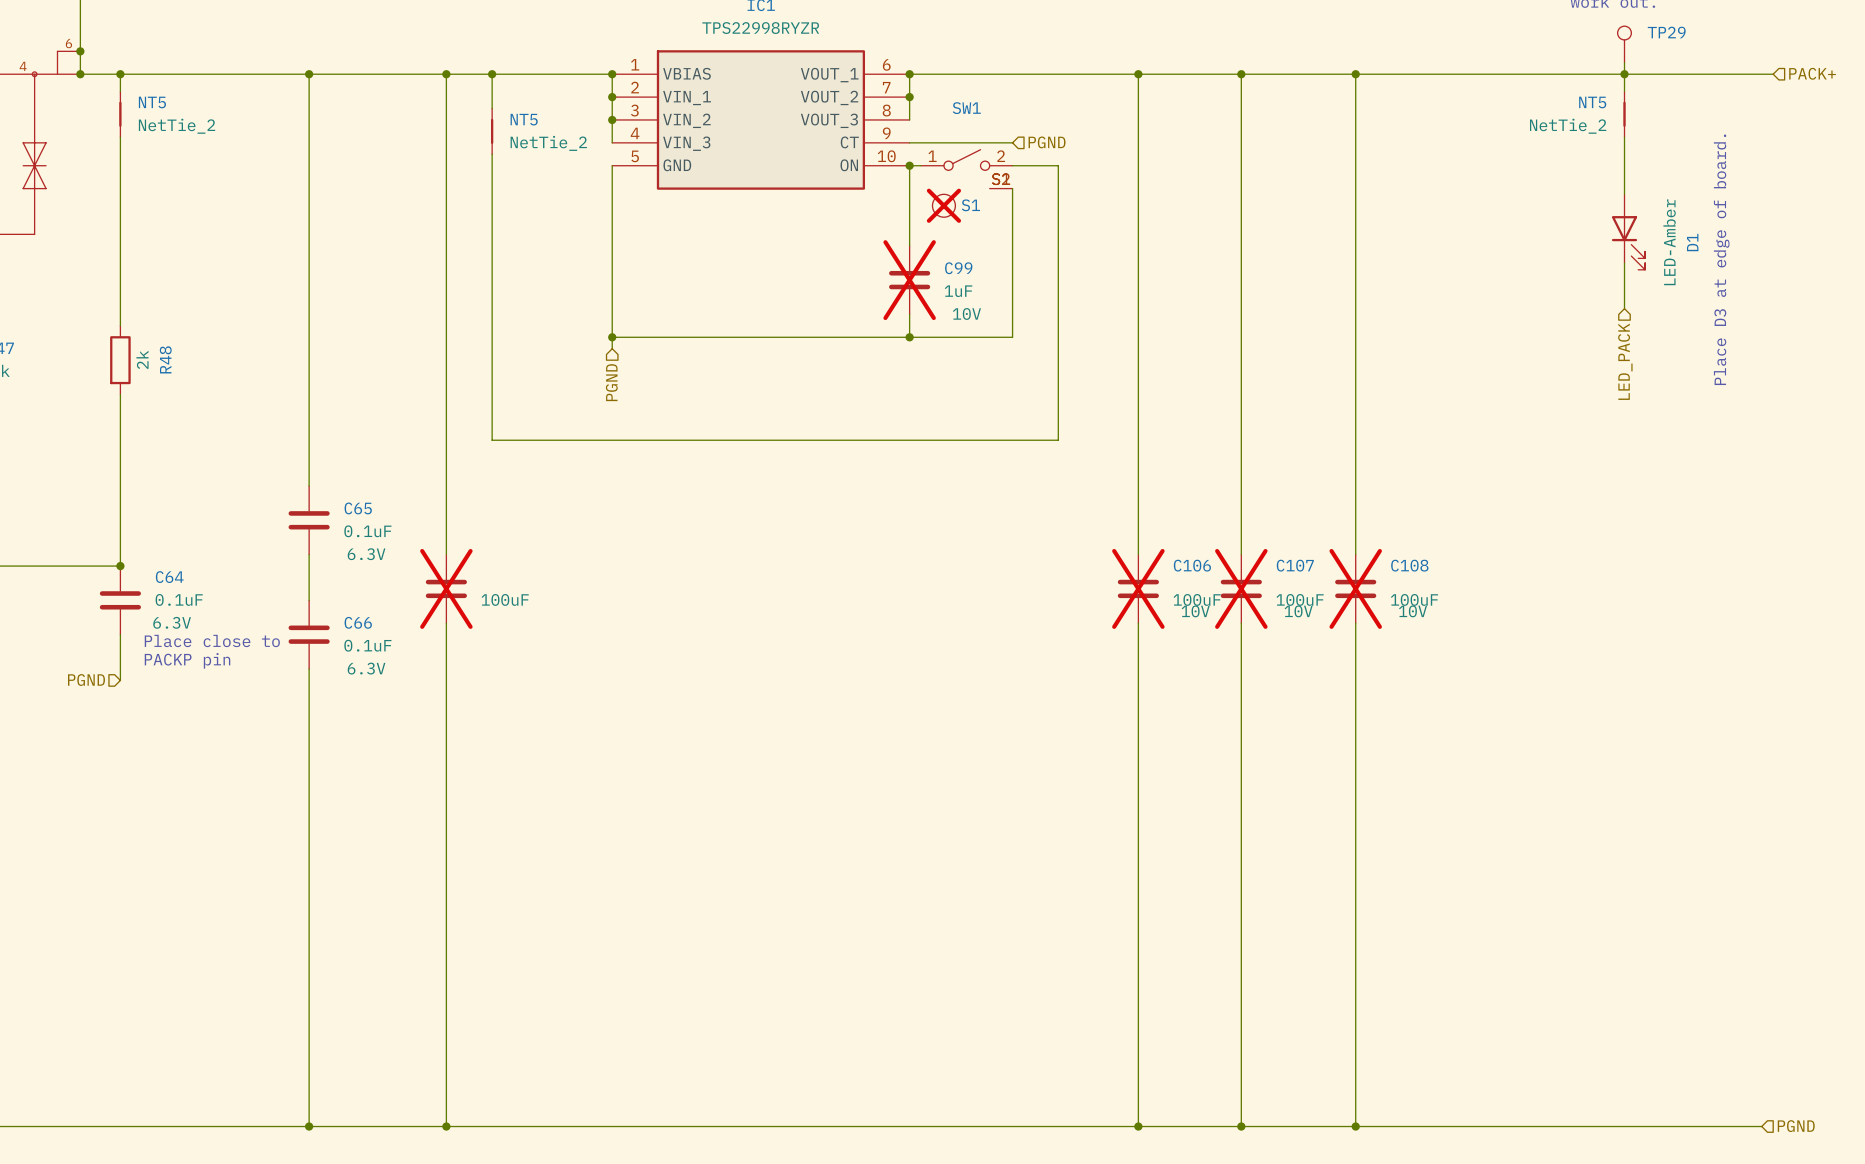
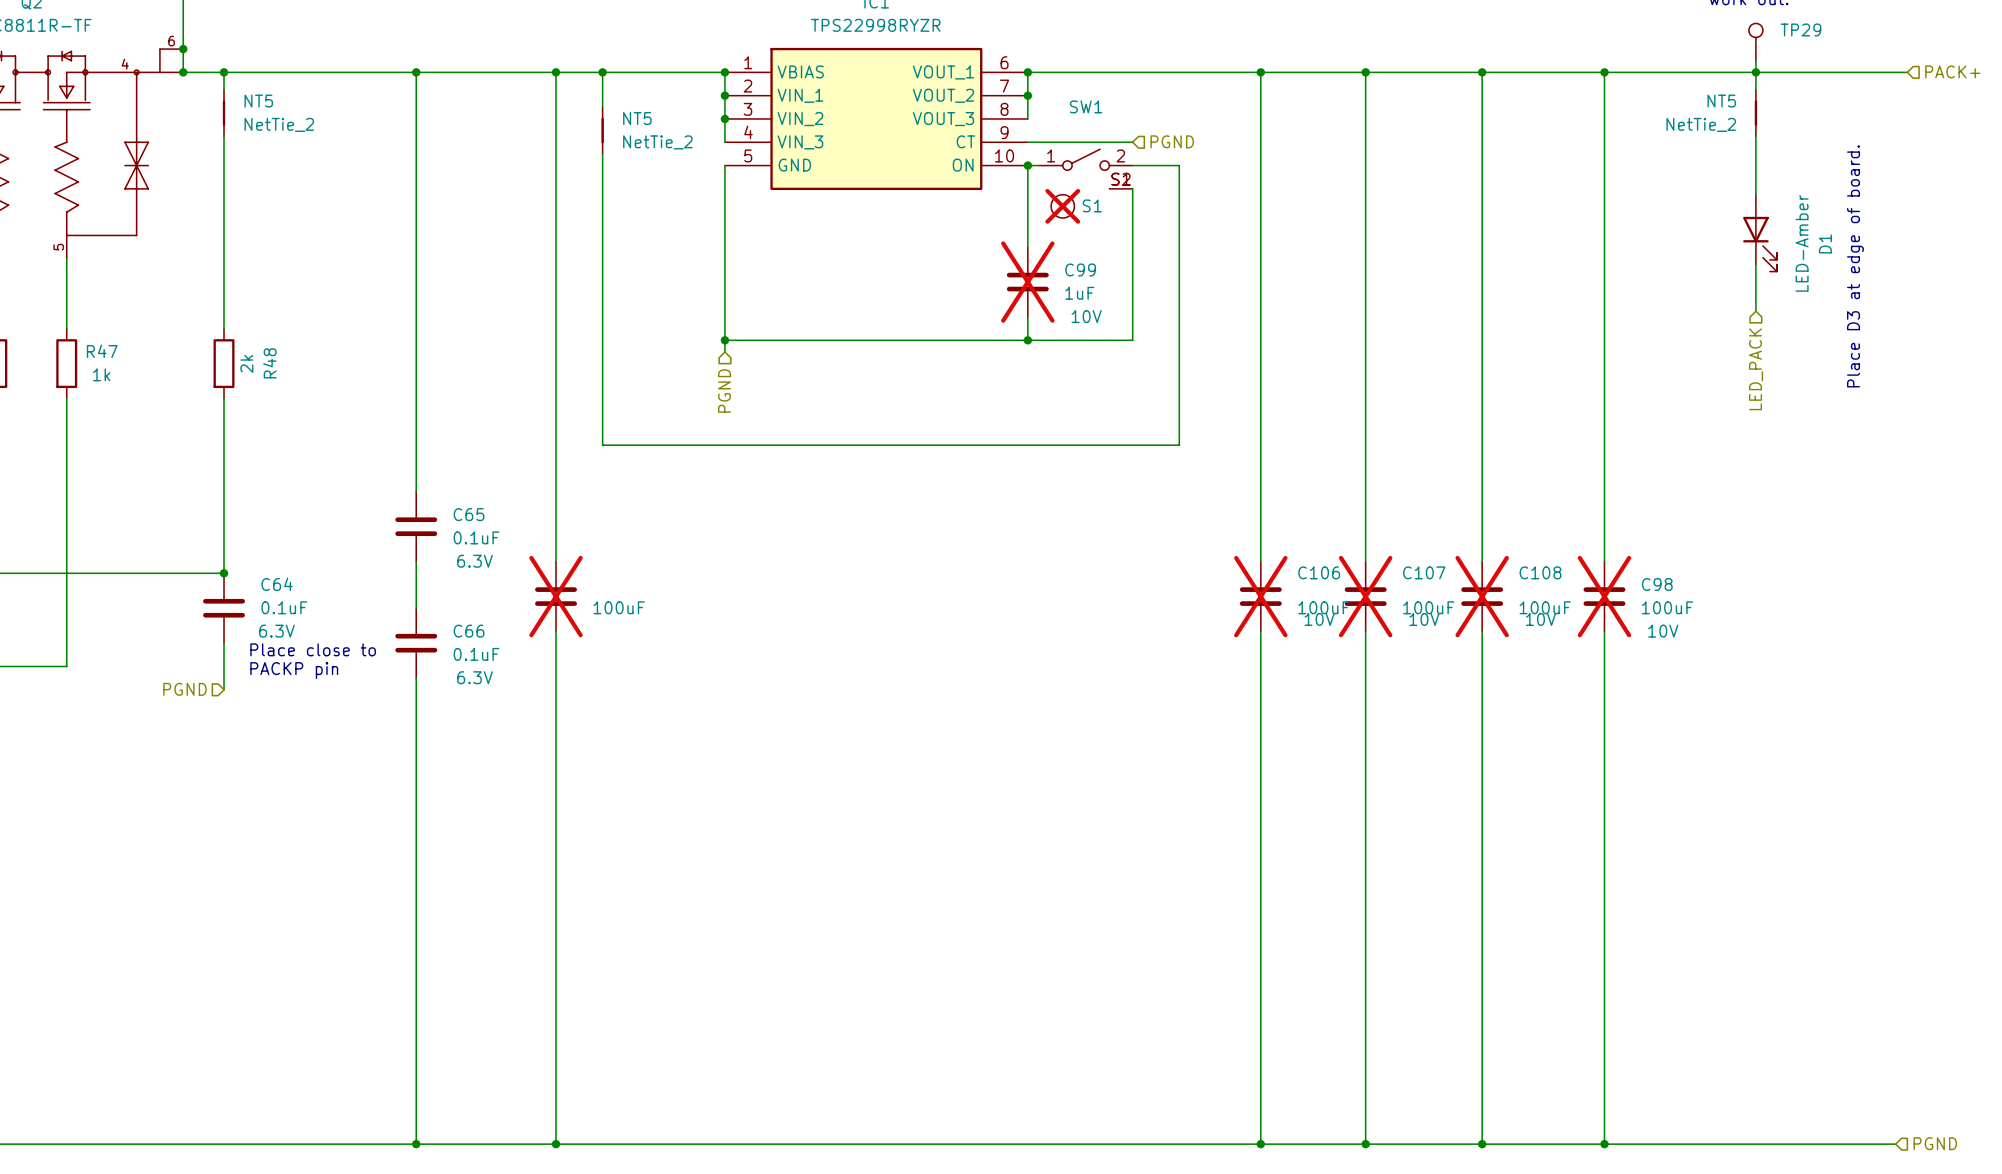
wire: none -> (1604, 72) (1604, 561)
junction: none -> (1604, 72)
C98: none -> 100uF (1604, 596)
wire: none -> (1604, 631) (1604, 1144)
junction: none -> (1604, 1144)

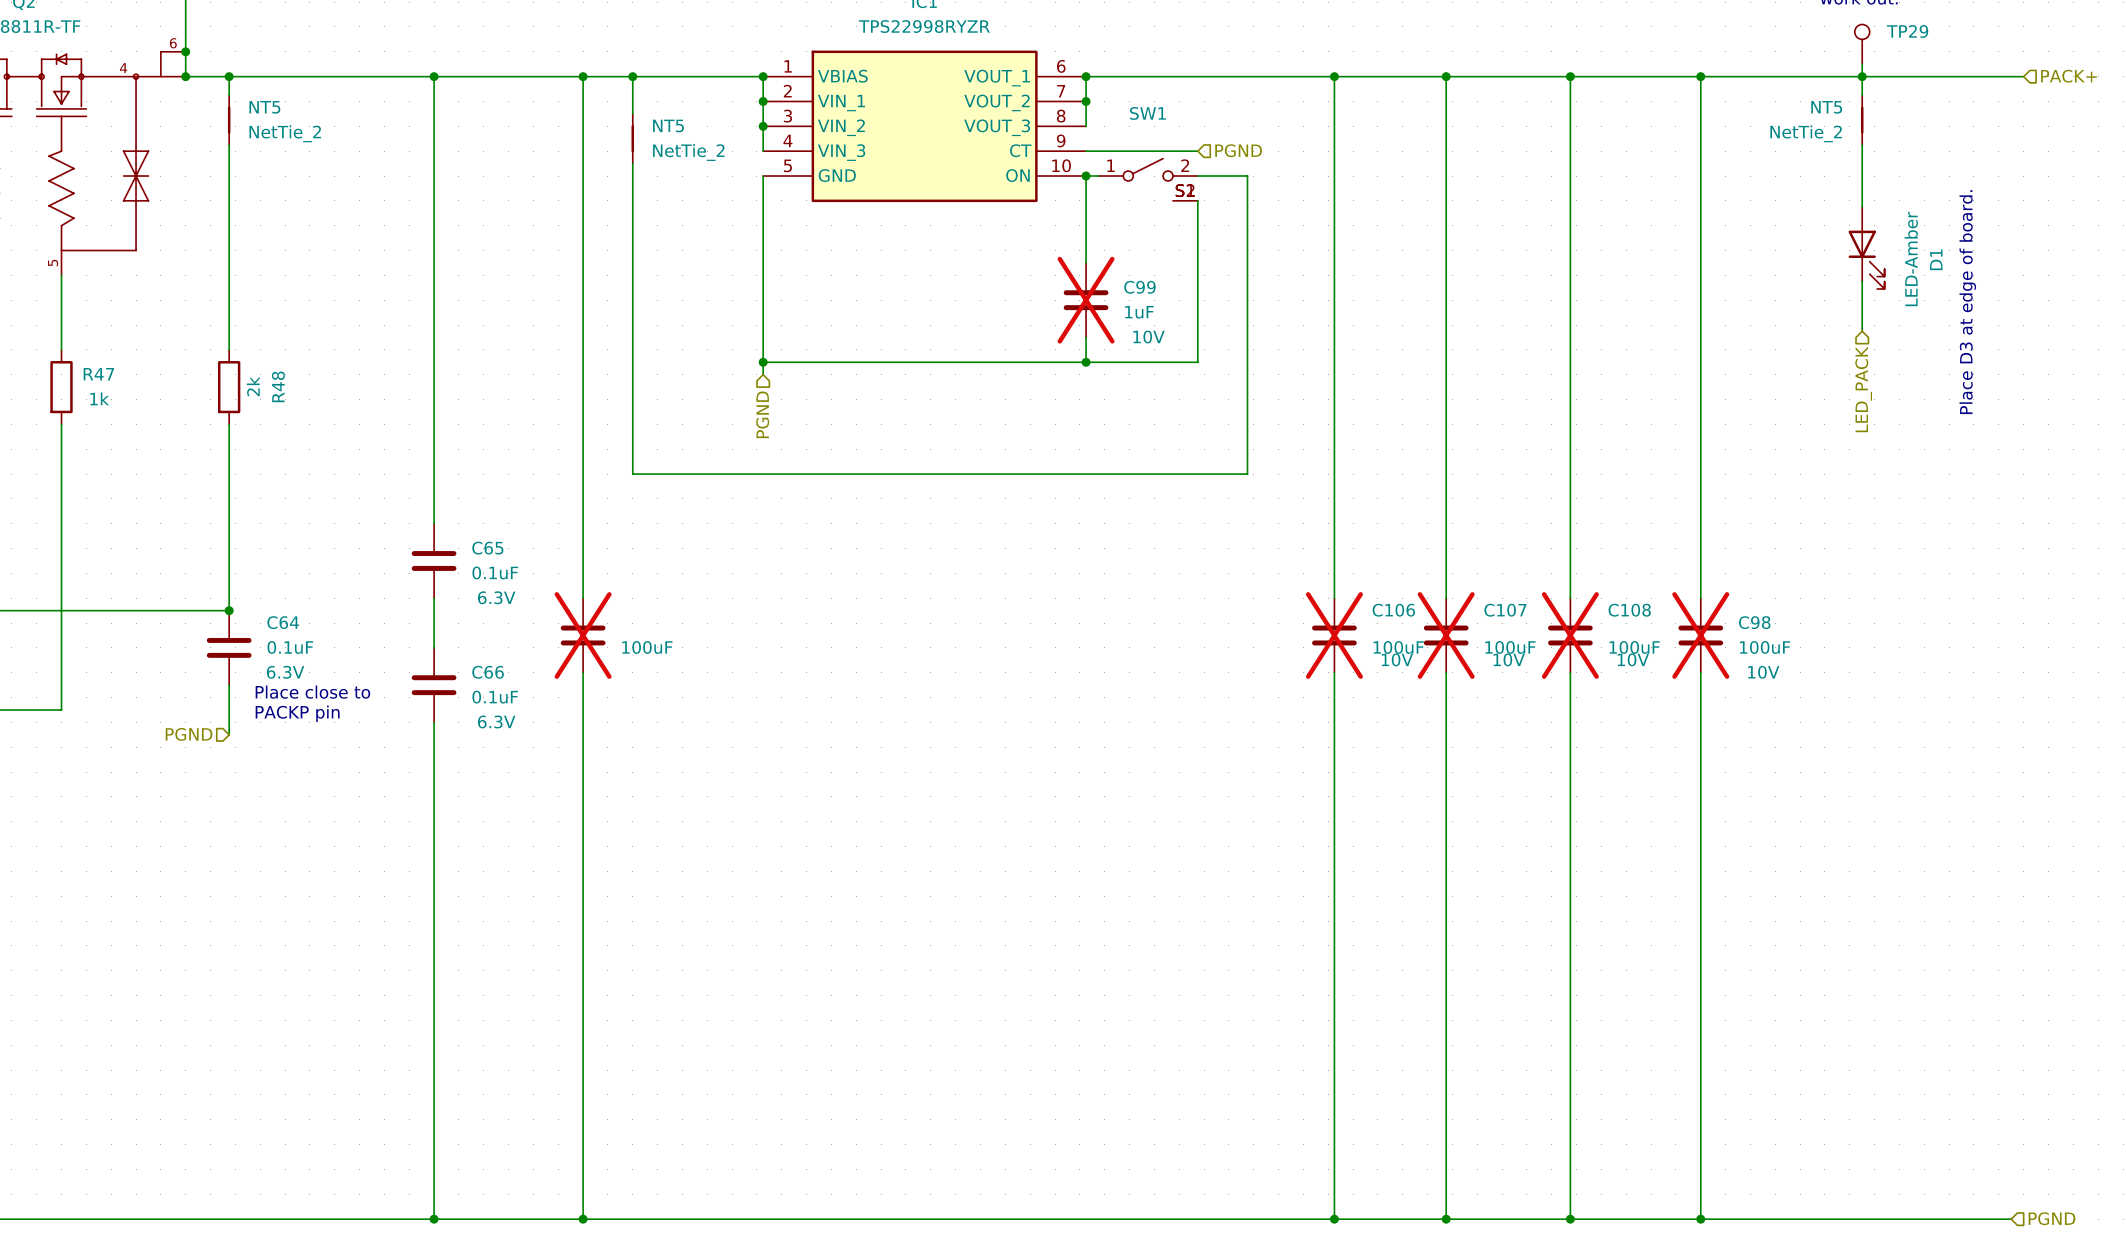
S1: (1062, 206) -> none

